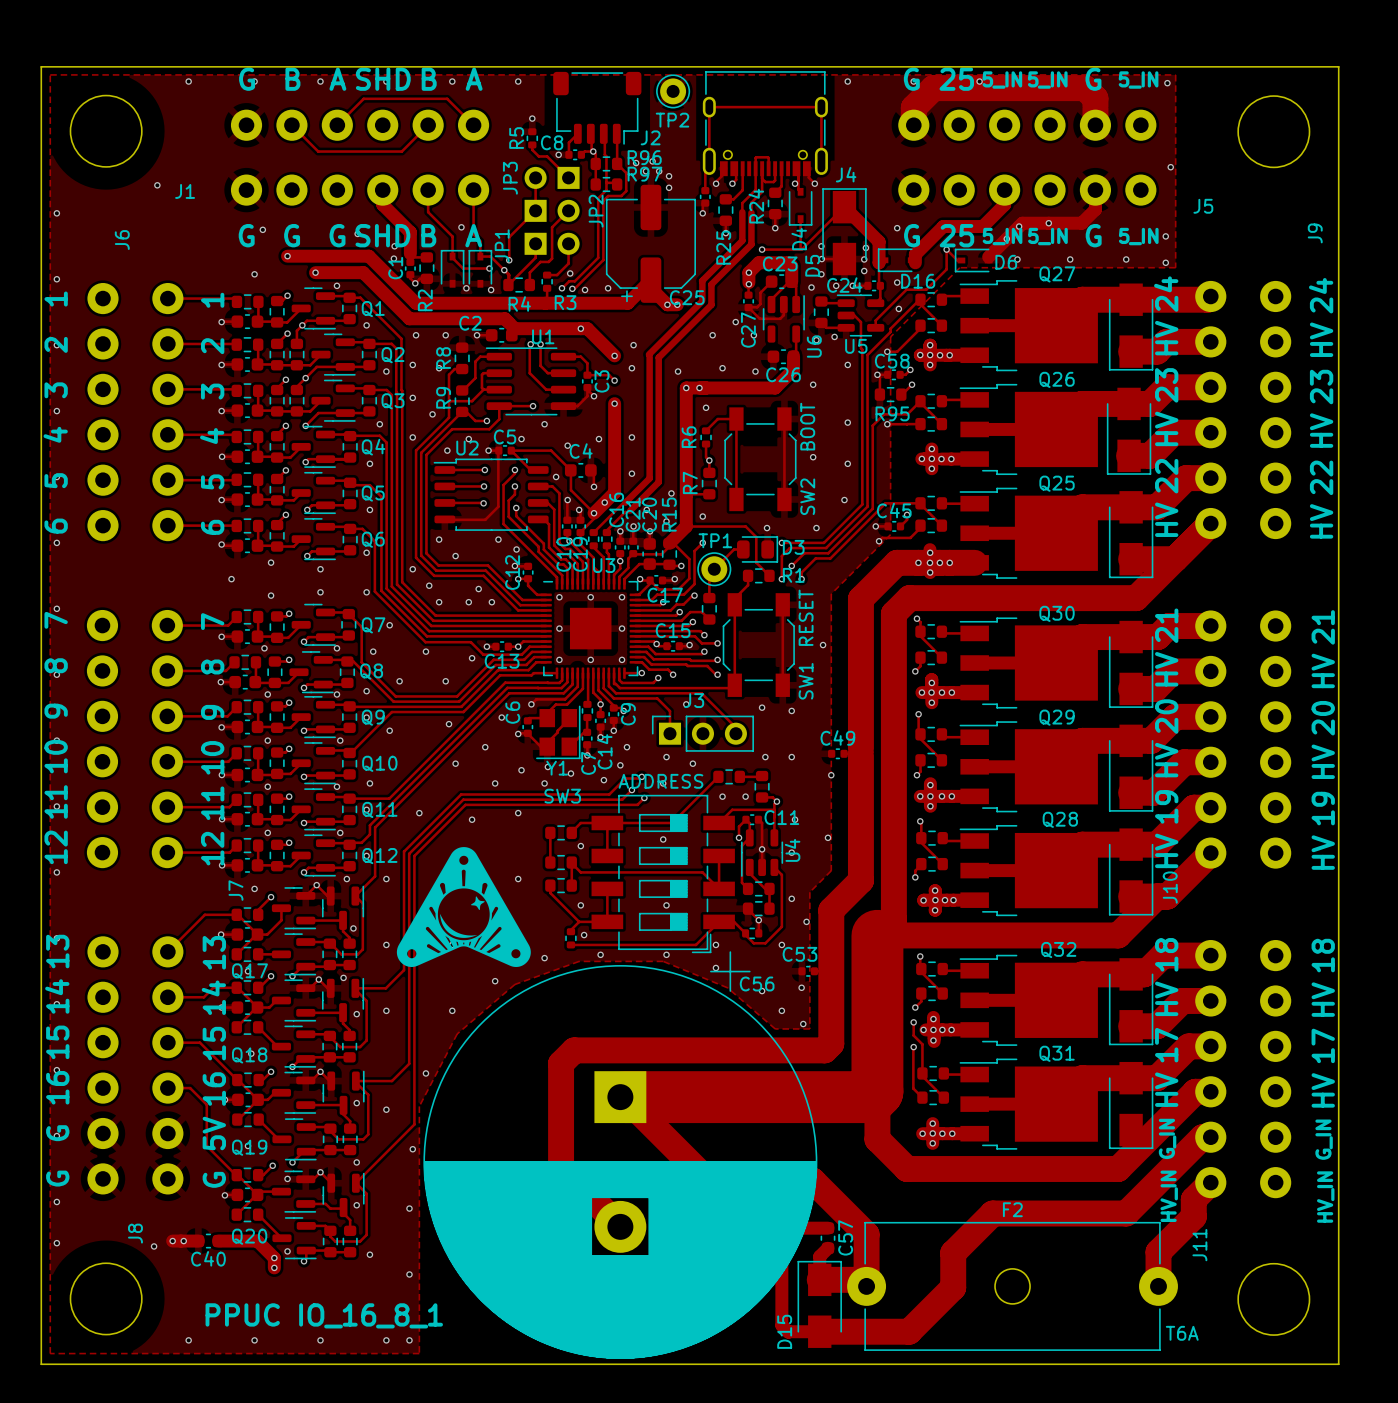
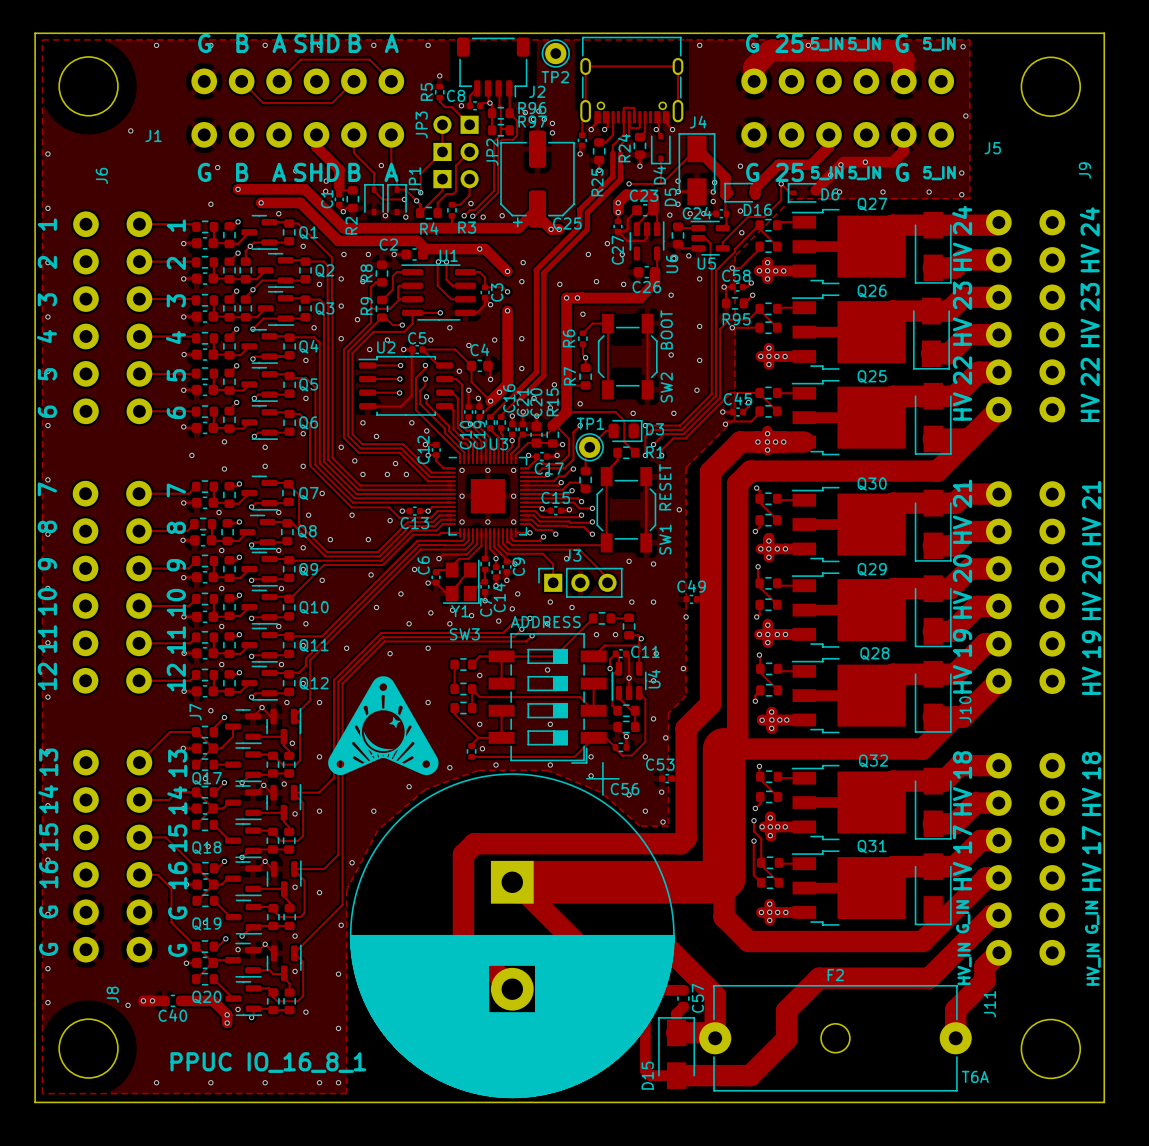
text: G (292, 235) -> B (242, 172)
text: G (337, 235) -> A (279, 172)
text: 5V (214, 1133) -> G (177, 913)

